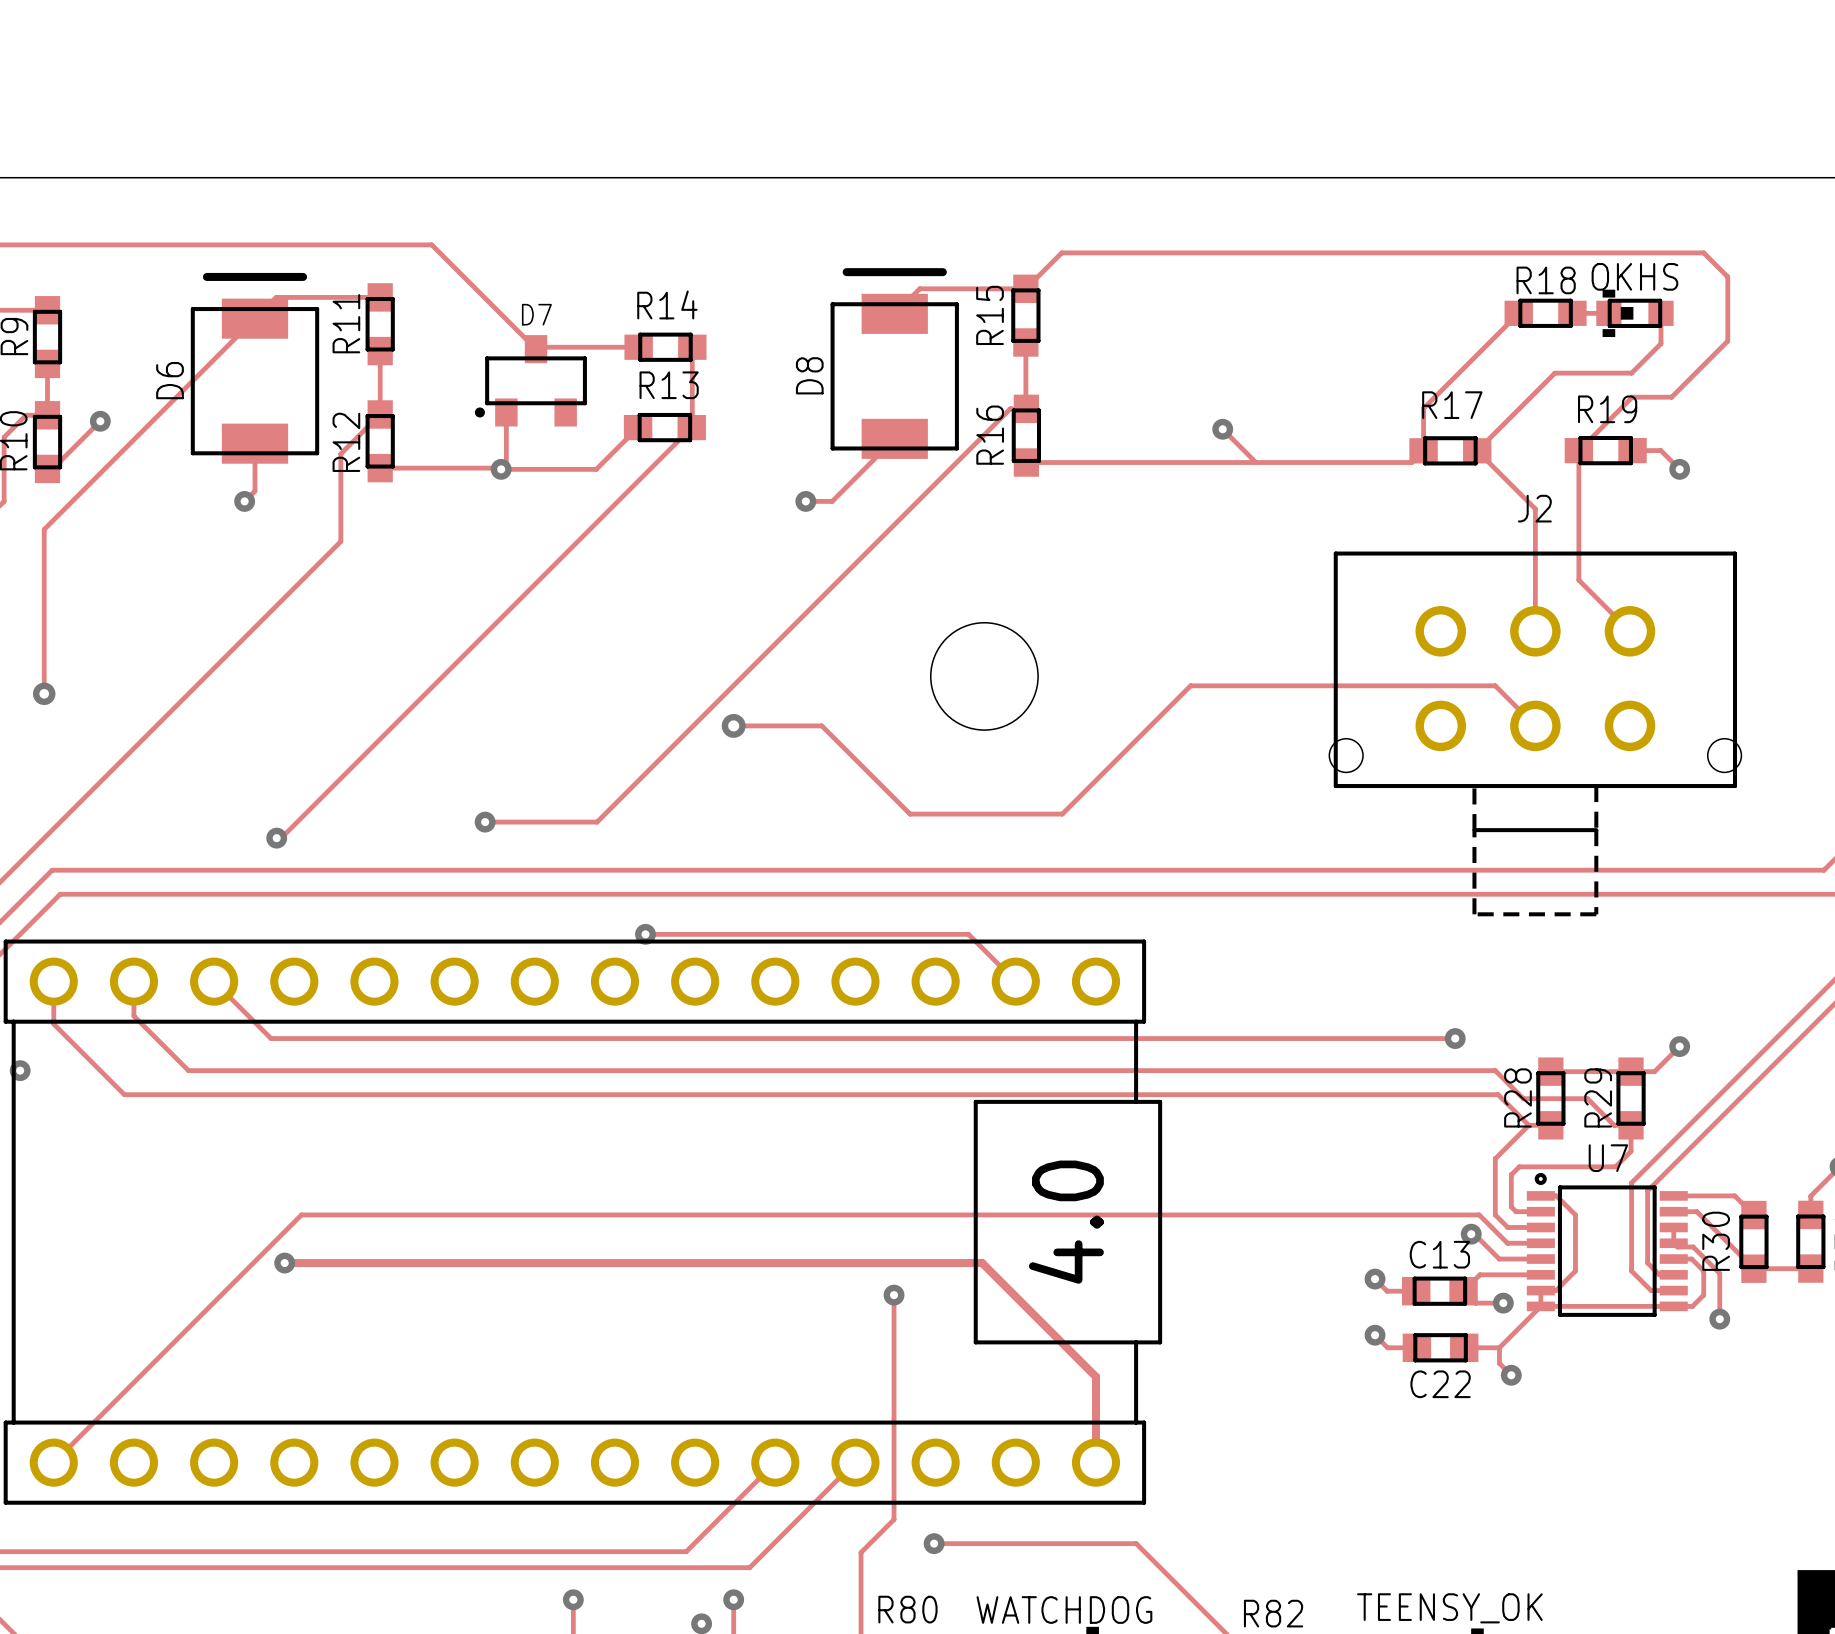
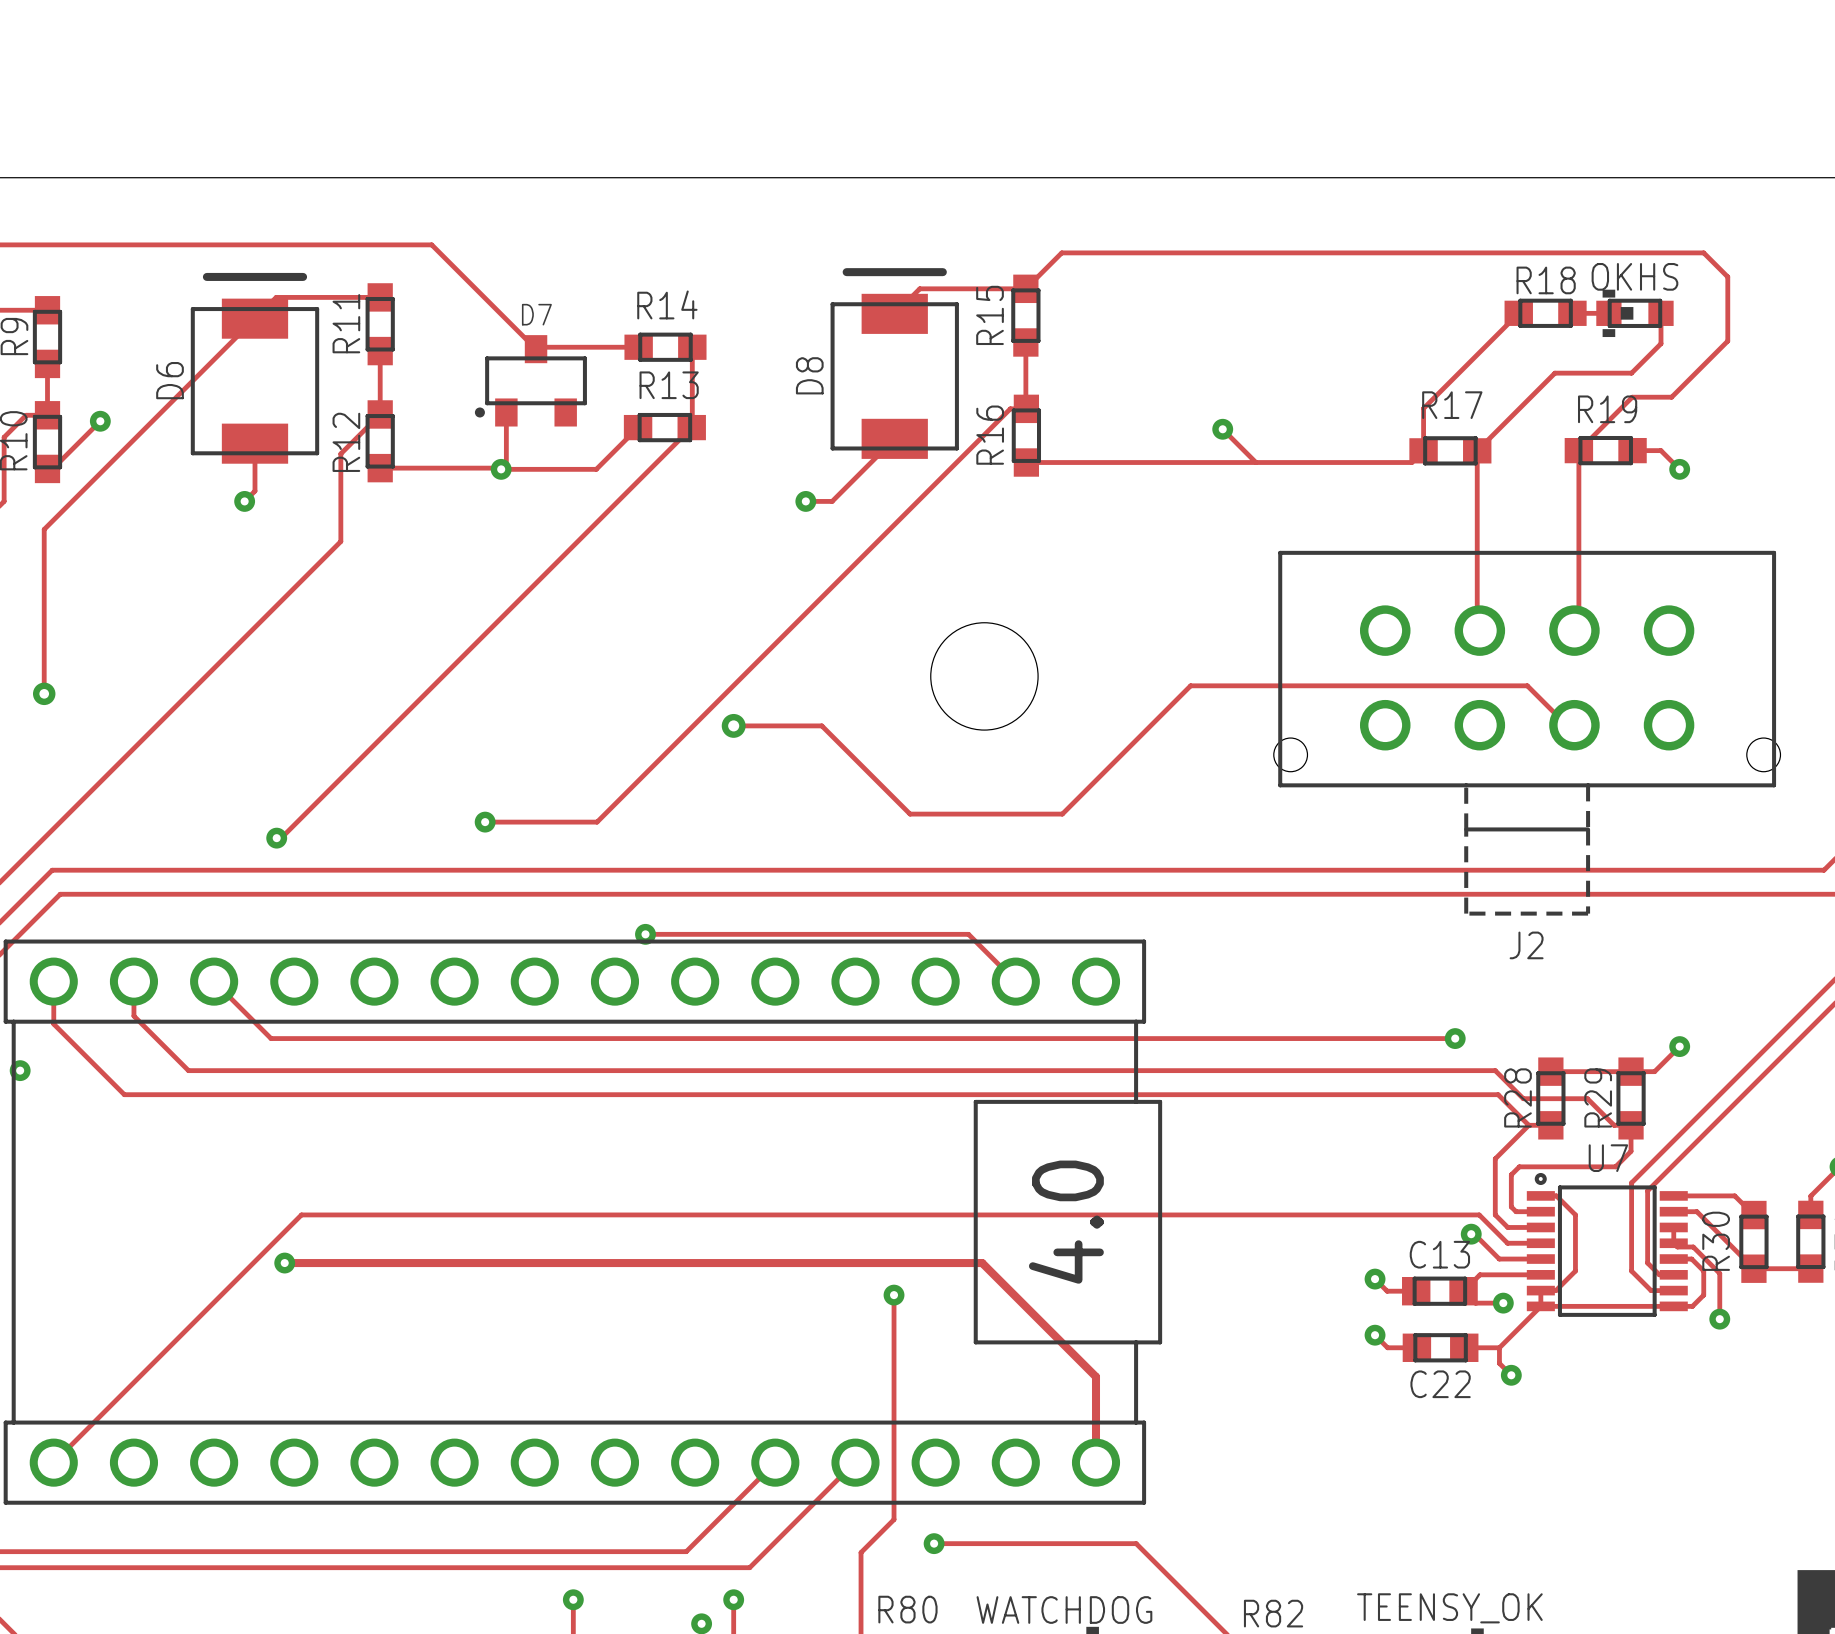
track: (1477, 450) (1535, 508) (1535, 631) -> (1477, 450) (1477, 628) (1479, 630)
J2 name position: J2 (1534, 508) -> J2 (1526, 945)
J2 footprint: [1329, 551, 1742, 917] -> [1273, 550, 1781, 916]
track: (1578, 580) (1629, 631) -> (1578, 580) (1578, 626) (1574, 630)
track: (1495, 685) (1535, 725) -> (1495, 685) (1527, 685) (1566, 725) (1574, 725)

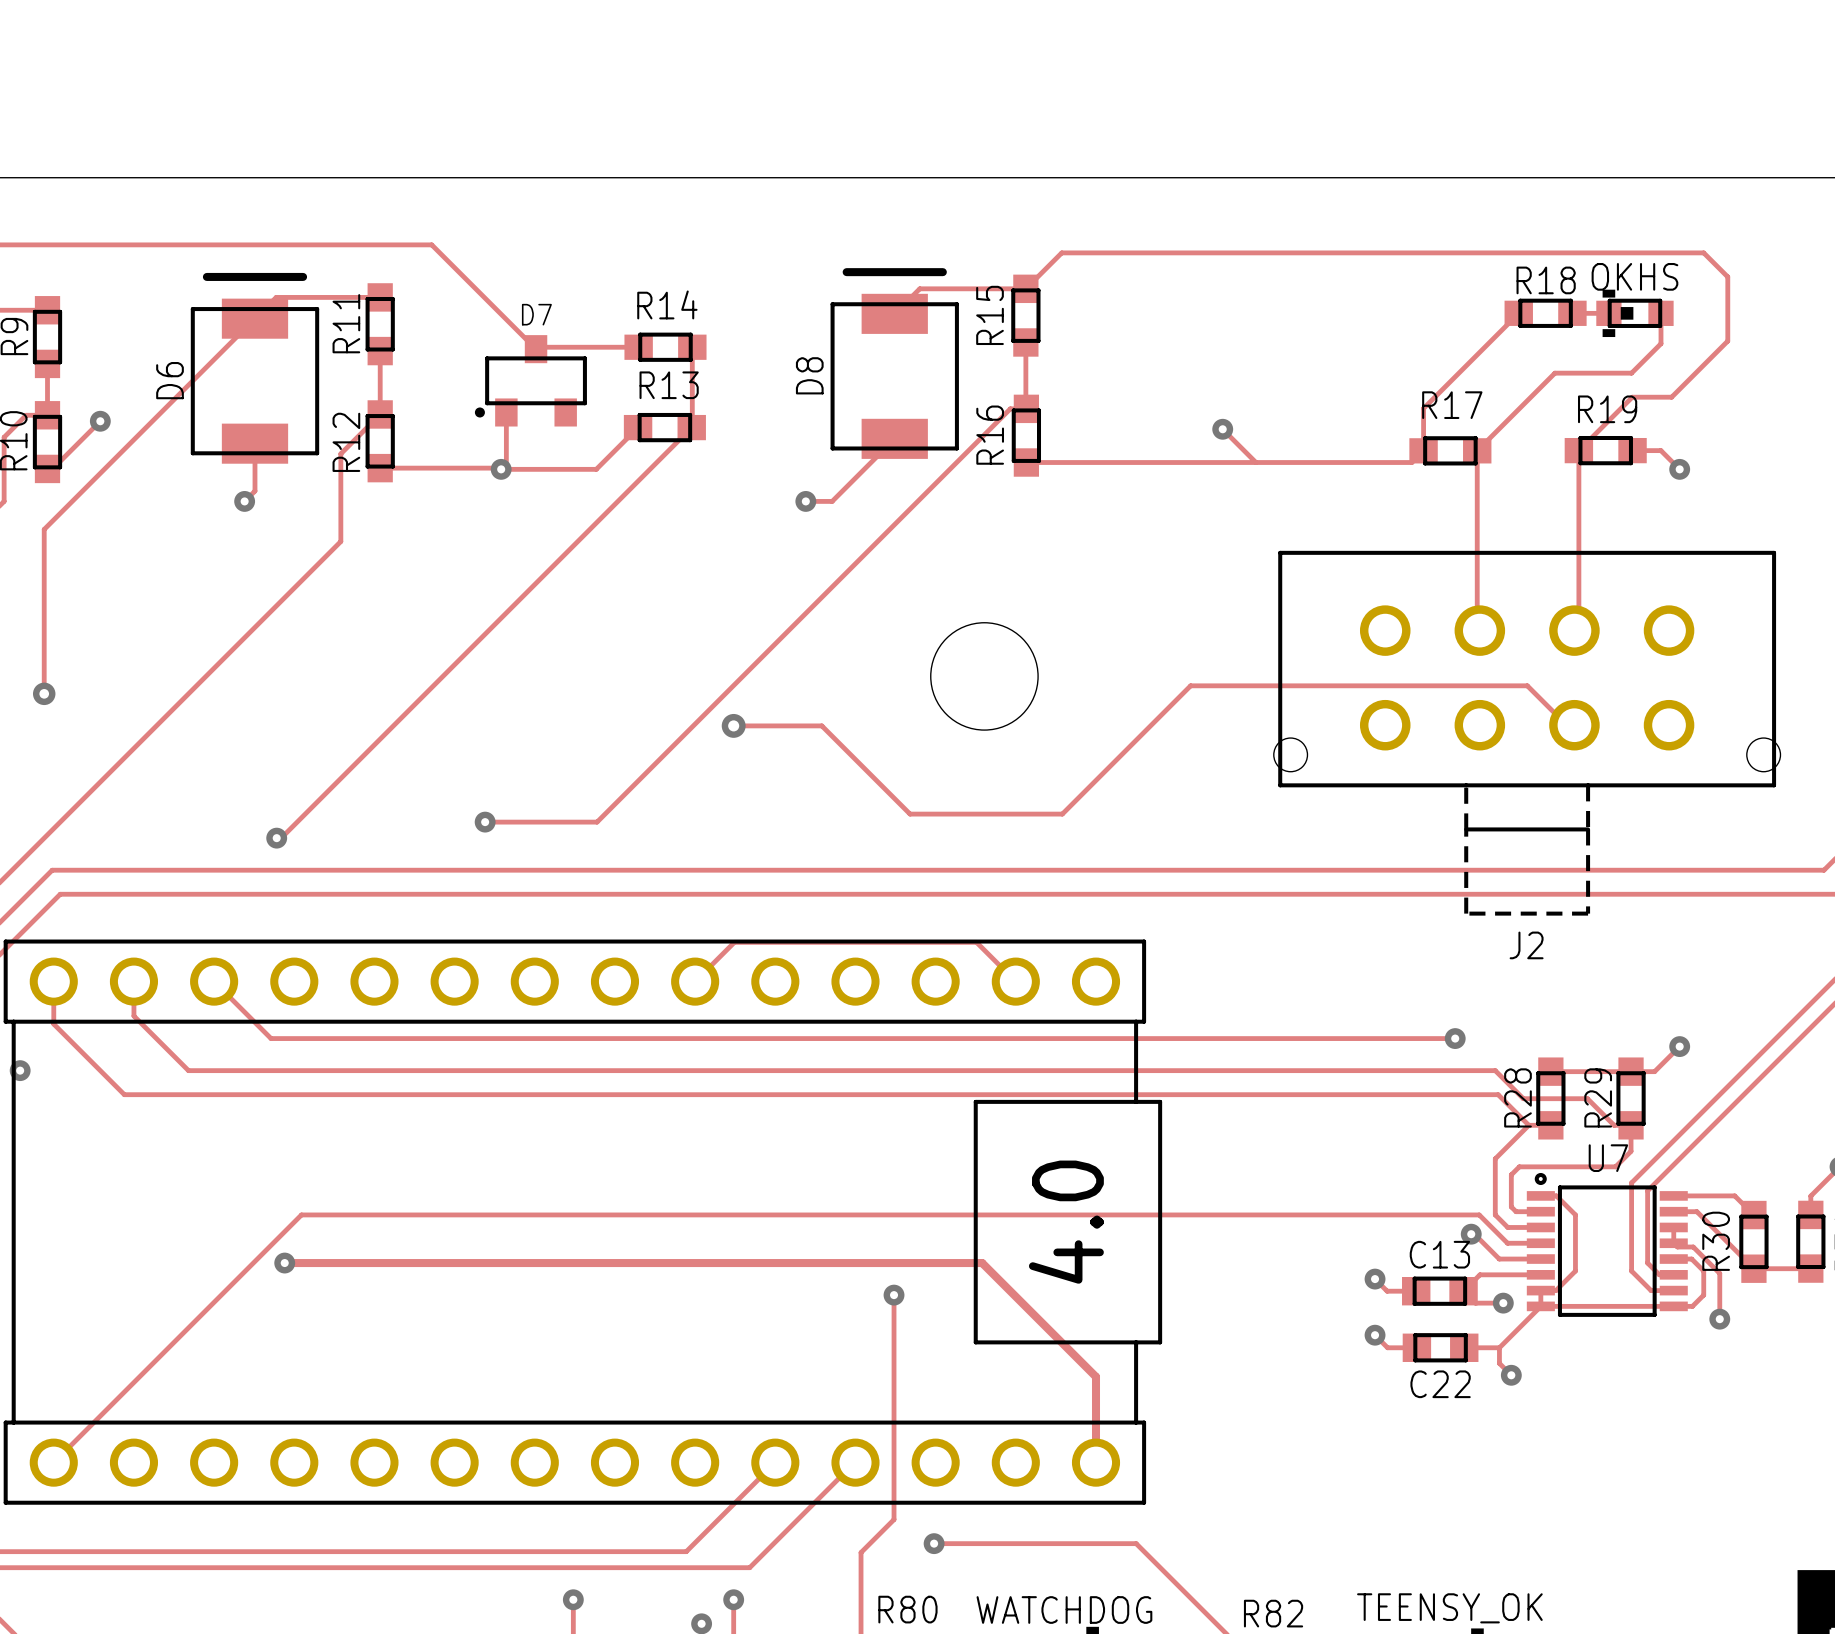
track: (645, 934) (968, 934) (976, 942) -> (695, 981) (734, 942) (976, 942)
via: (645, 934) -> none

